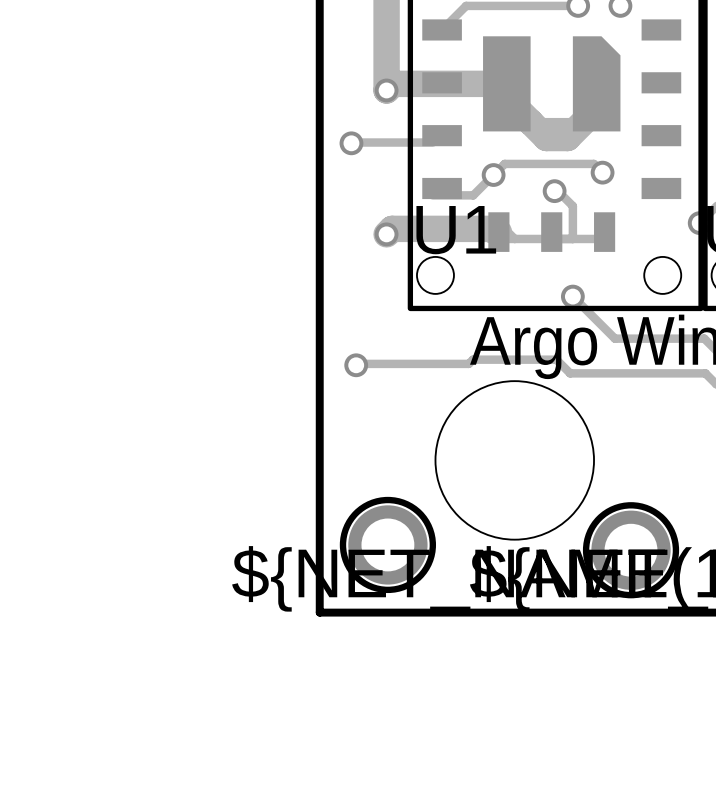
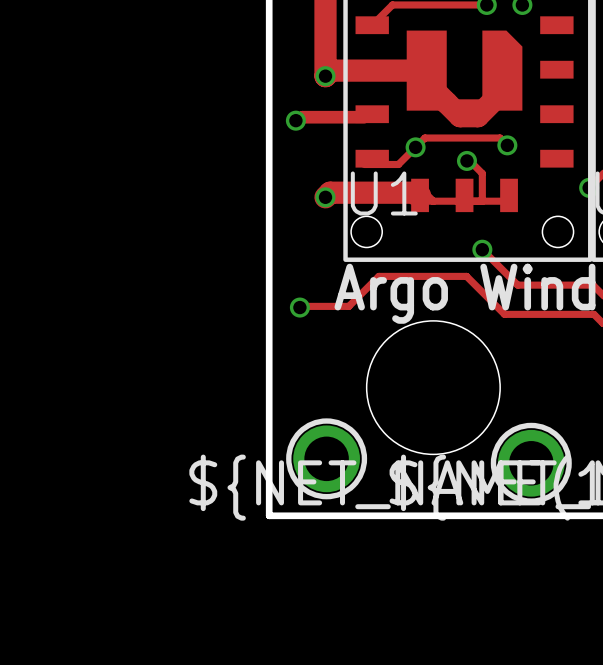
track: none -> (369, 114) (302, 114) (296, 120)
track: (414, 363) (468, 363) (473, 359) (556, 359) (570, 373) (599, 373) -> (348, 306) (378, 276) (466, 276) (504, 314)

